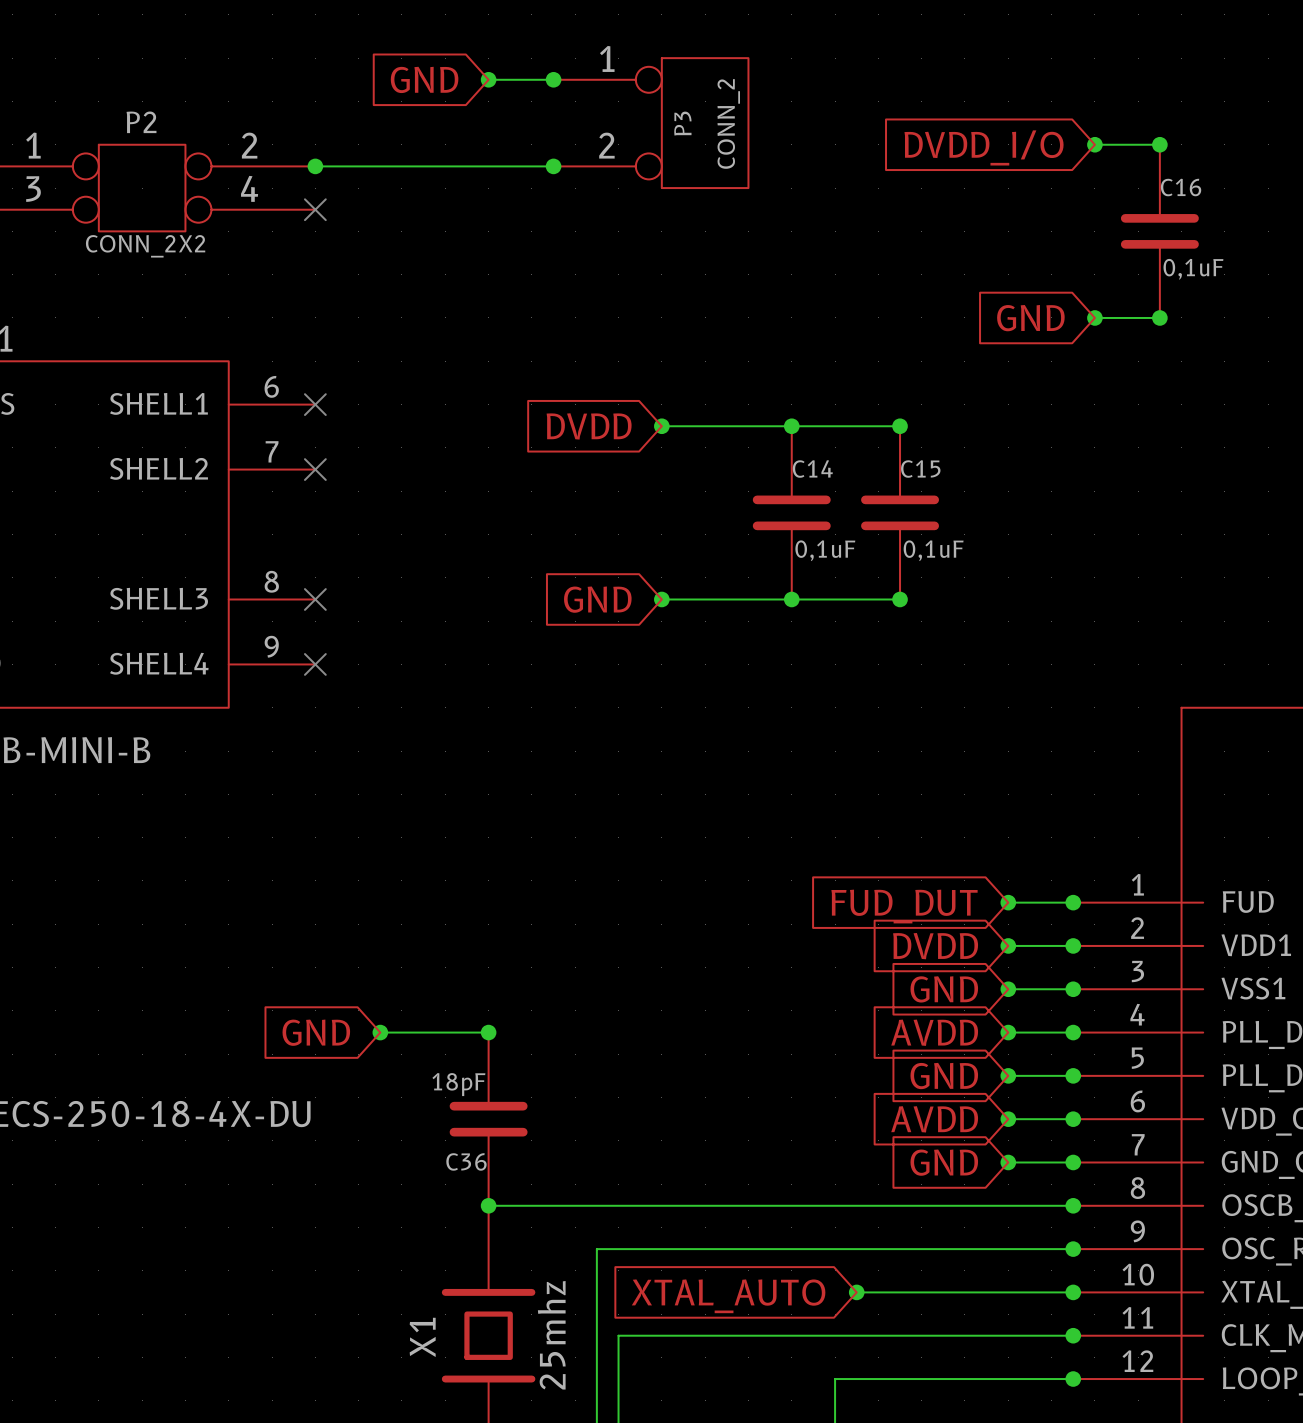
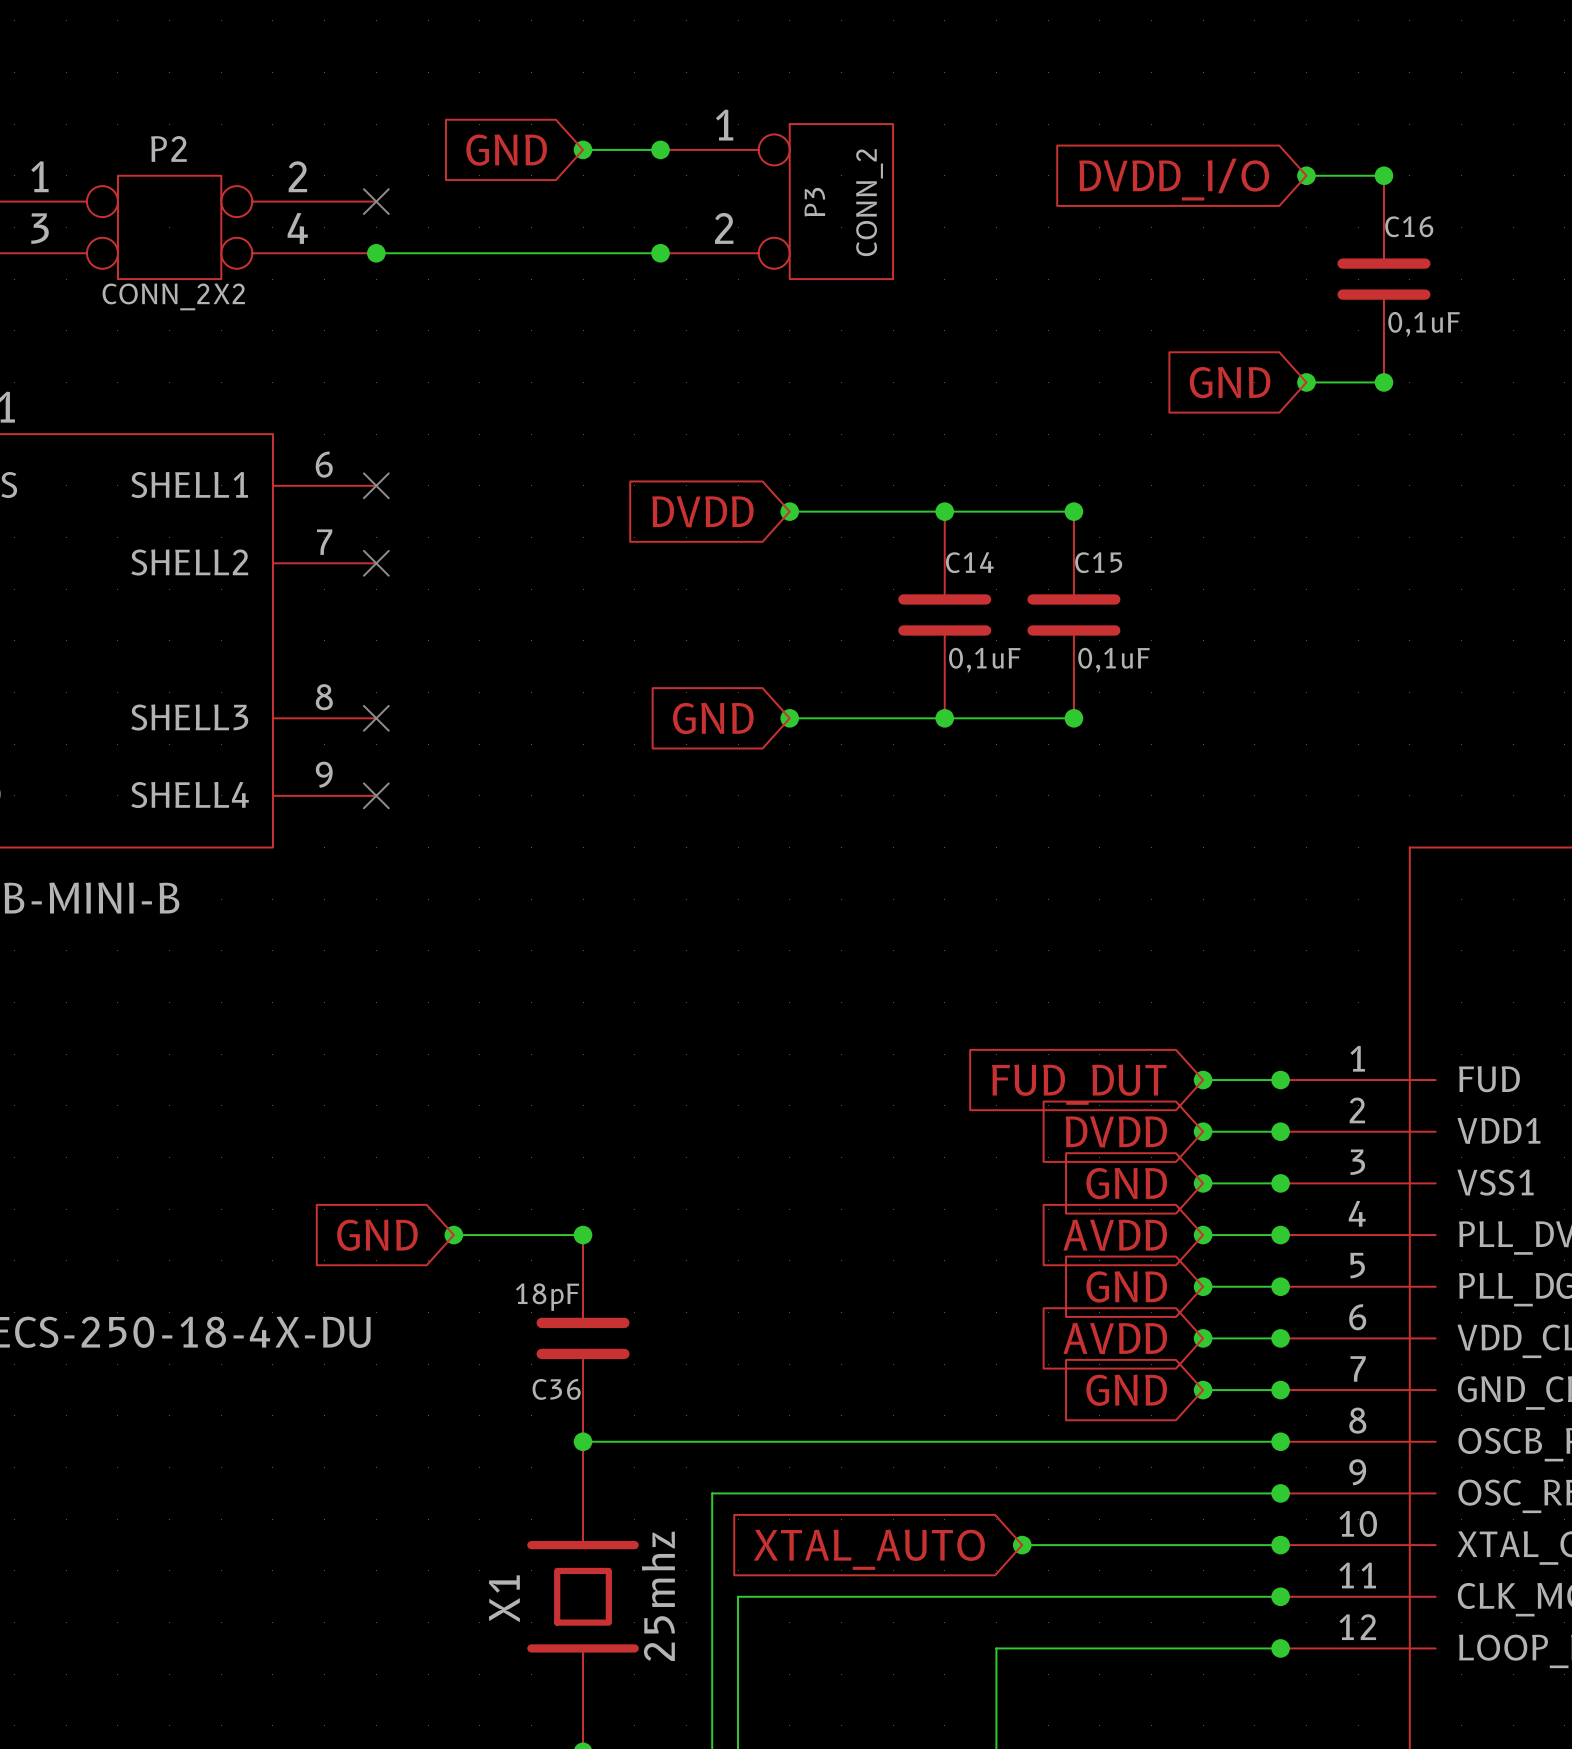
global label position: GND (424, 79) -> GND (506, 150)
wire: (488, 79) (553, 79) -> (583, 149) (660, 149)
junction: (488, 79) -> none
junction: (553, 79) -> none
junction: none -> (583, 149)
junction: none -> (660, 149)
P3 position: (651, 123) -> (776, 201)
wire: (315, 166) (553, 166) -> (376, 253) (660, 253)
junction position: (315, 166) -> (376, 253)
junction: (553, 166) -> none
no-connect mark position: (315, 209) -> (376, 201)
junction: none -> (660, 253)

